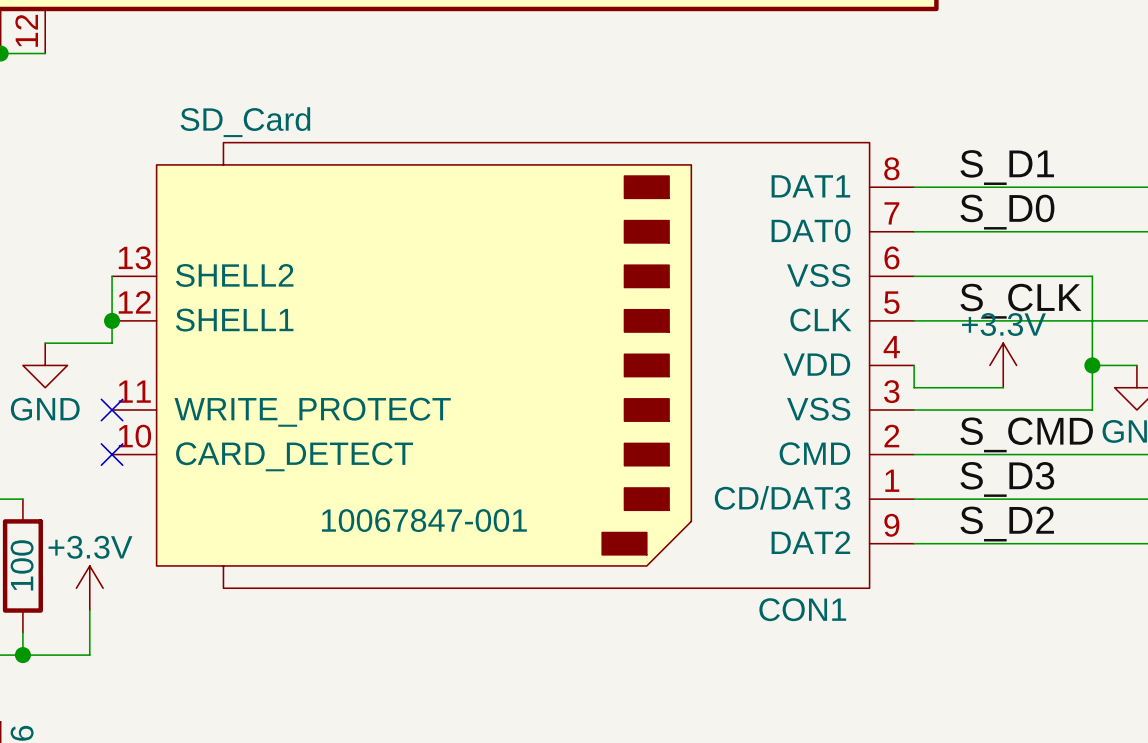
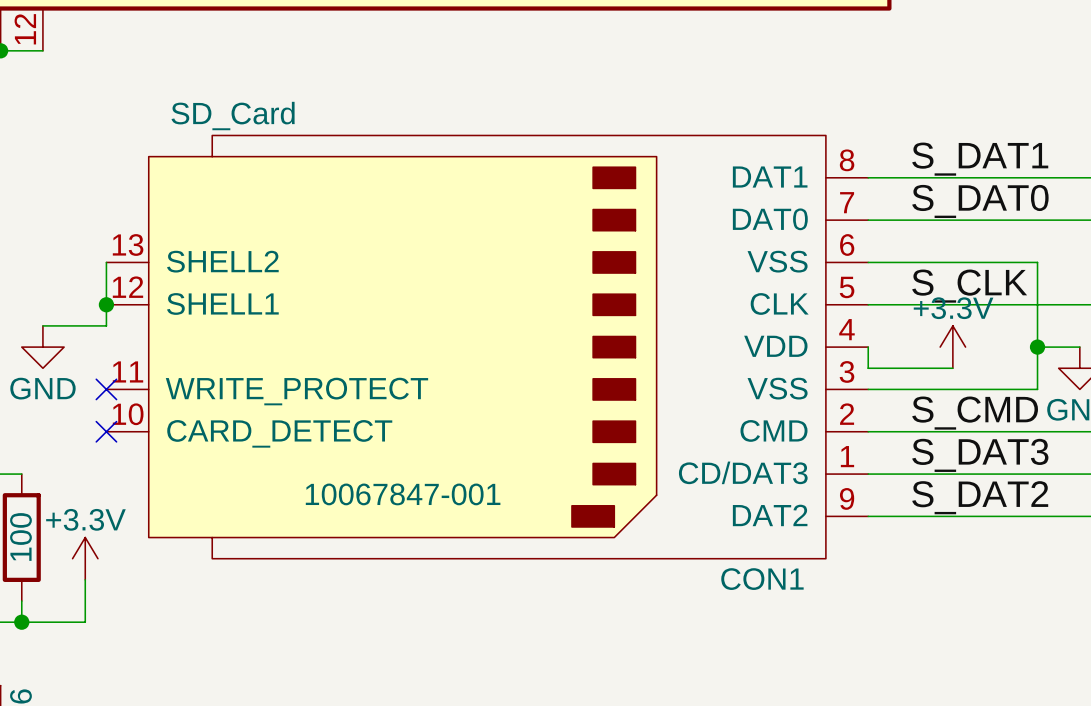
label: S_D1 (1007, 167) -> S_DAT1 (980, 159)
label: S_D0 (1007, 212) -> S_DAT0 (980, 201)
label: S_D3 (1007, 479) -> S_DAT3 (980, 455)
label: S_D2 (1007, 524) -> S_DAT2 (980, 497)

